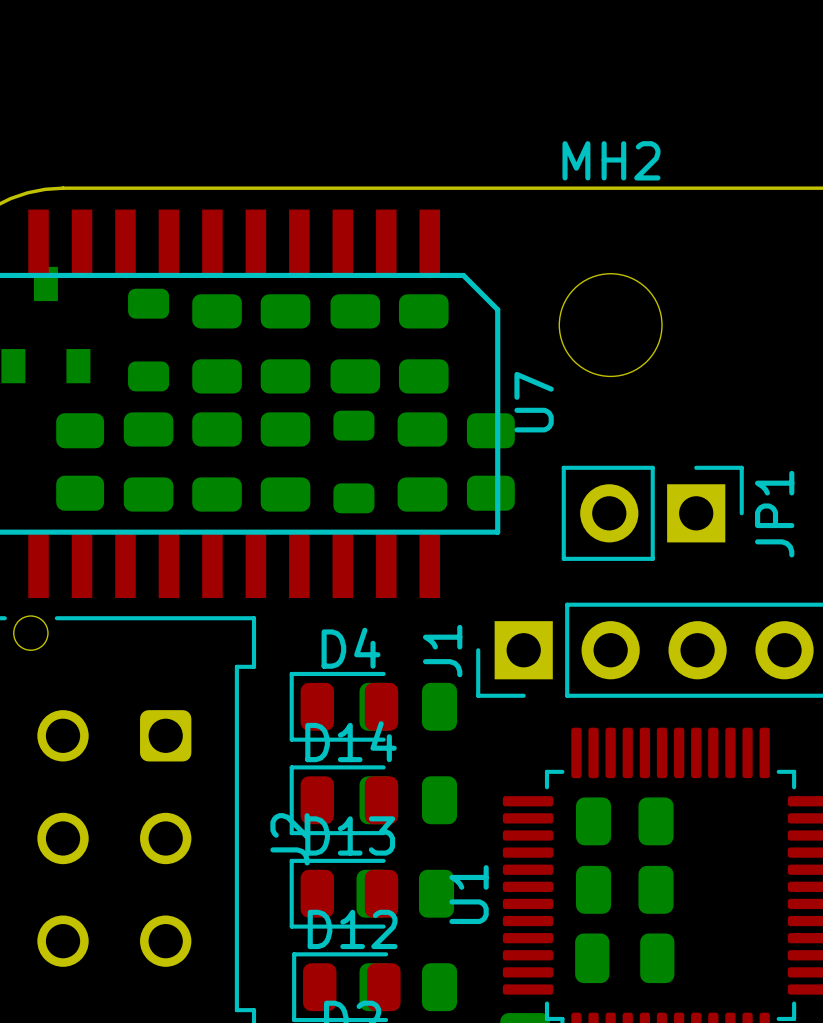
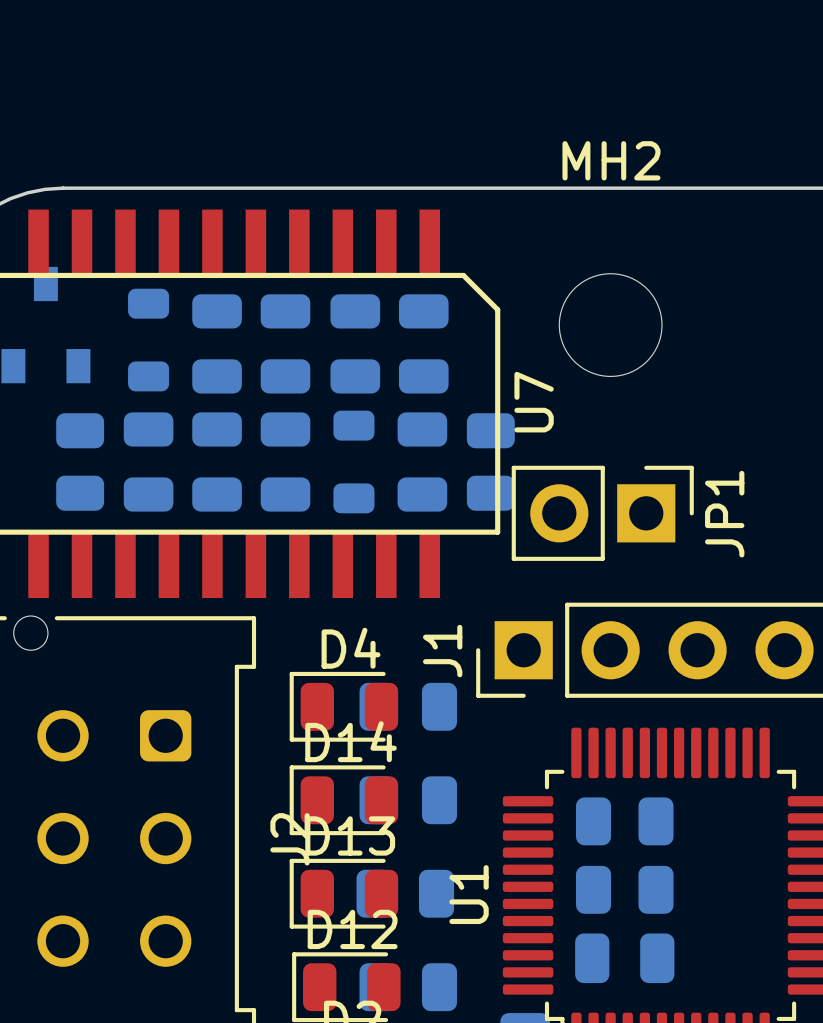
JP1 position: (652, 513) -> (602, 513)

